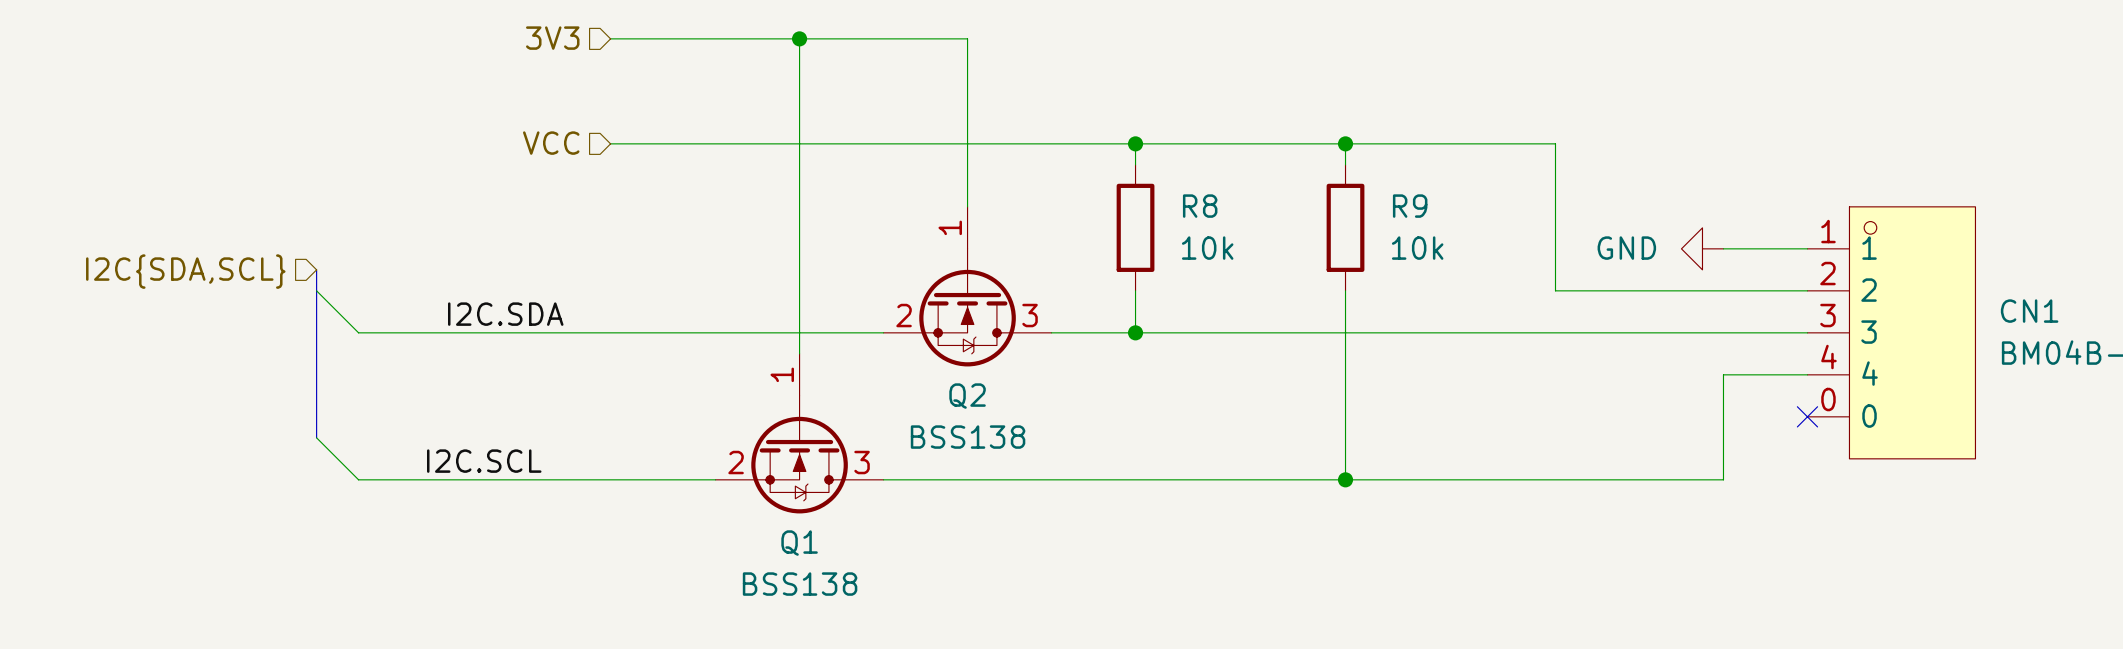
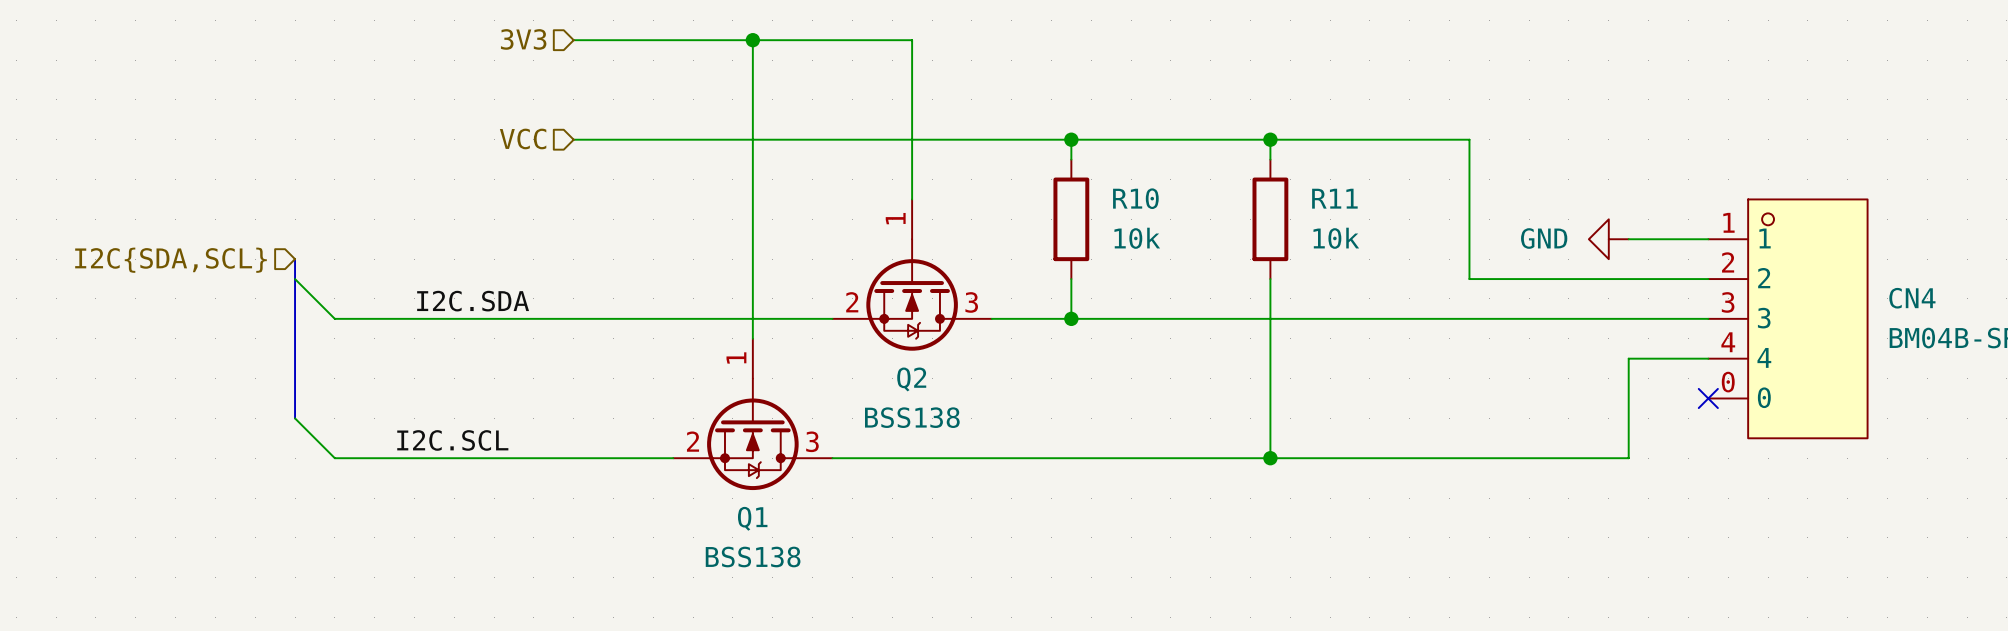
R8 name: R8 (1200, 206) -> R10 (1135, 198)
R9 name: R9 (1410, 206) -> R11 (1334, 198)
CN1 name: CN1 (2029, 311) -> CN4 (1912, 298)

